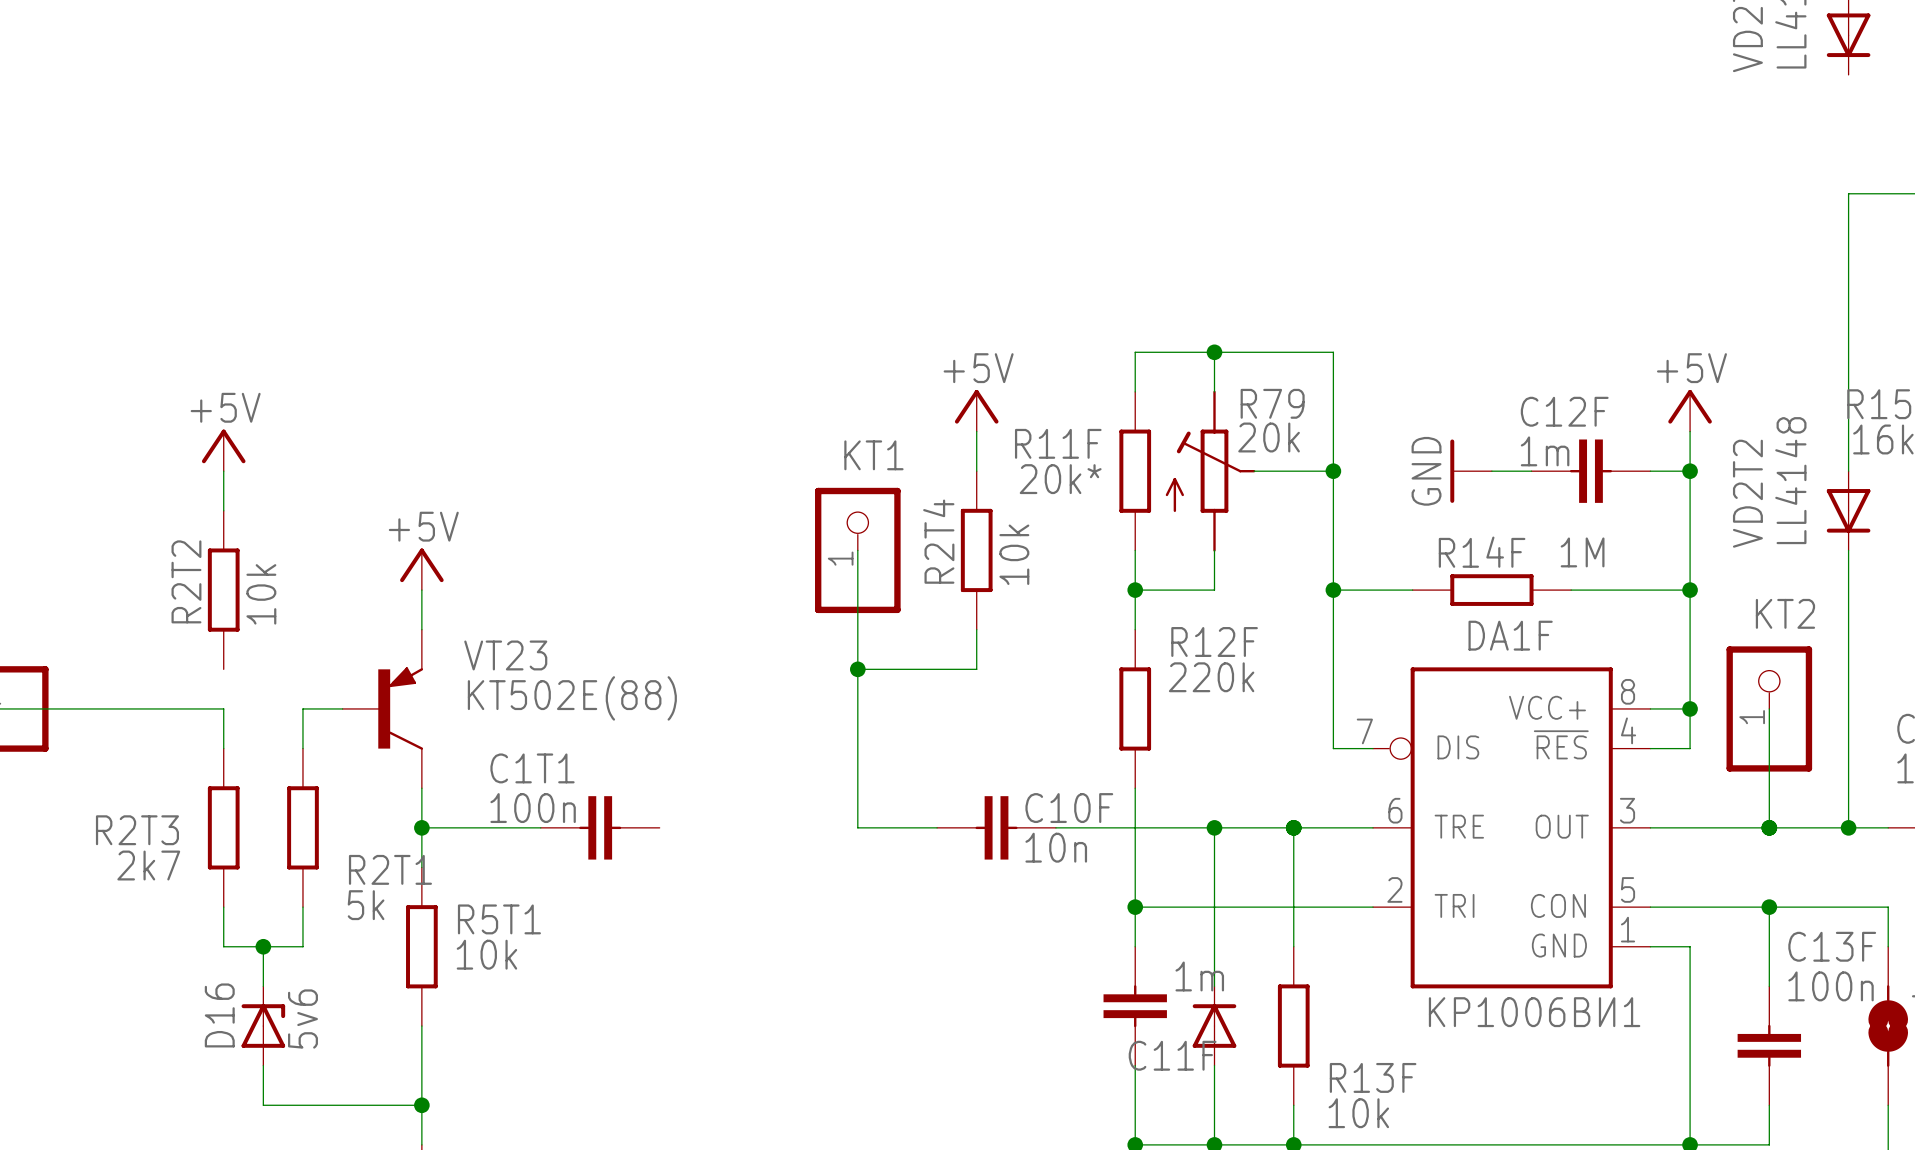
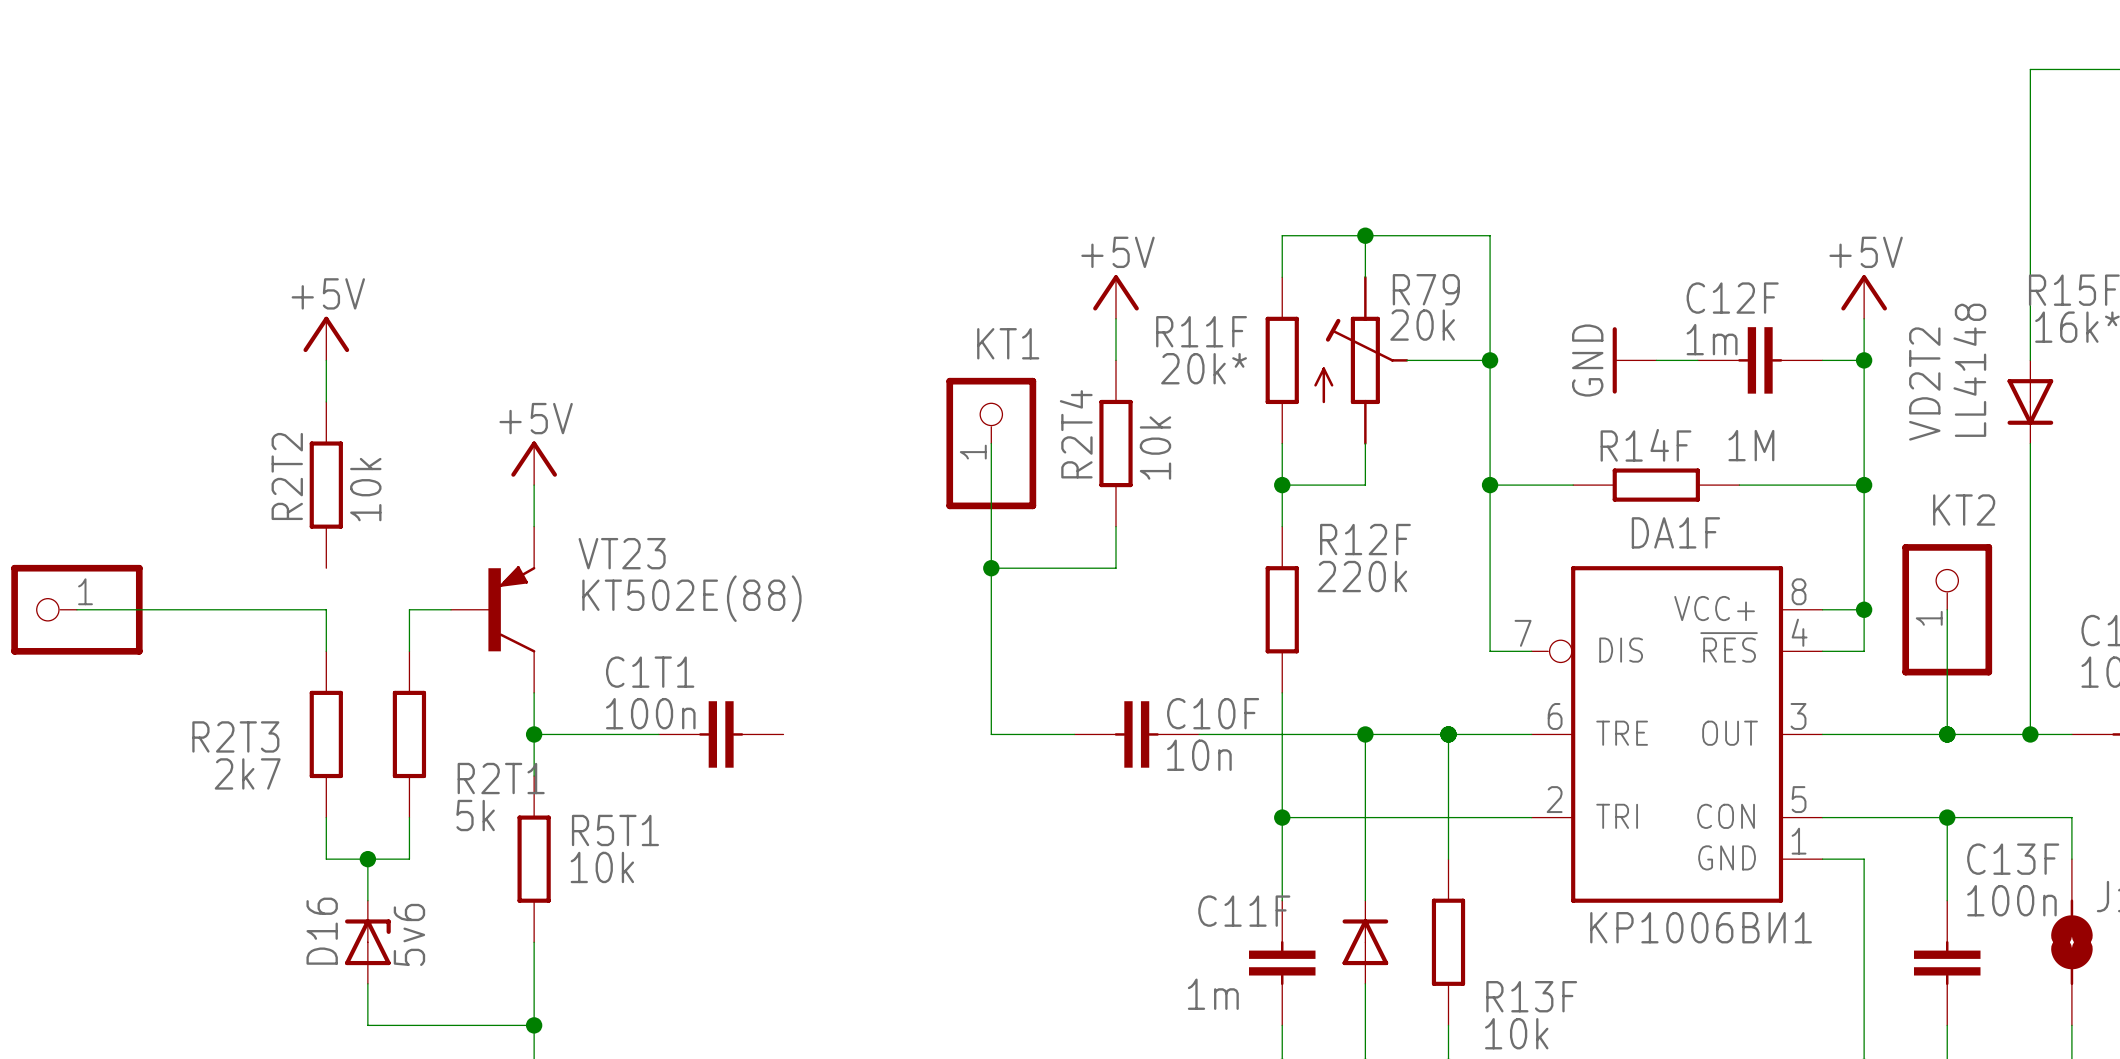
C11F value position: 1m (1199, 976) -> 1m (1213, 994)
C11F position: (1135, 1006) -> (1282, 963)
C11F name position: C11F (1172, 1055) -> C11F (1244, 911)

